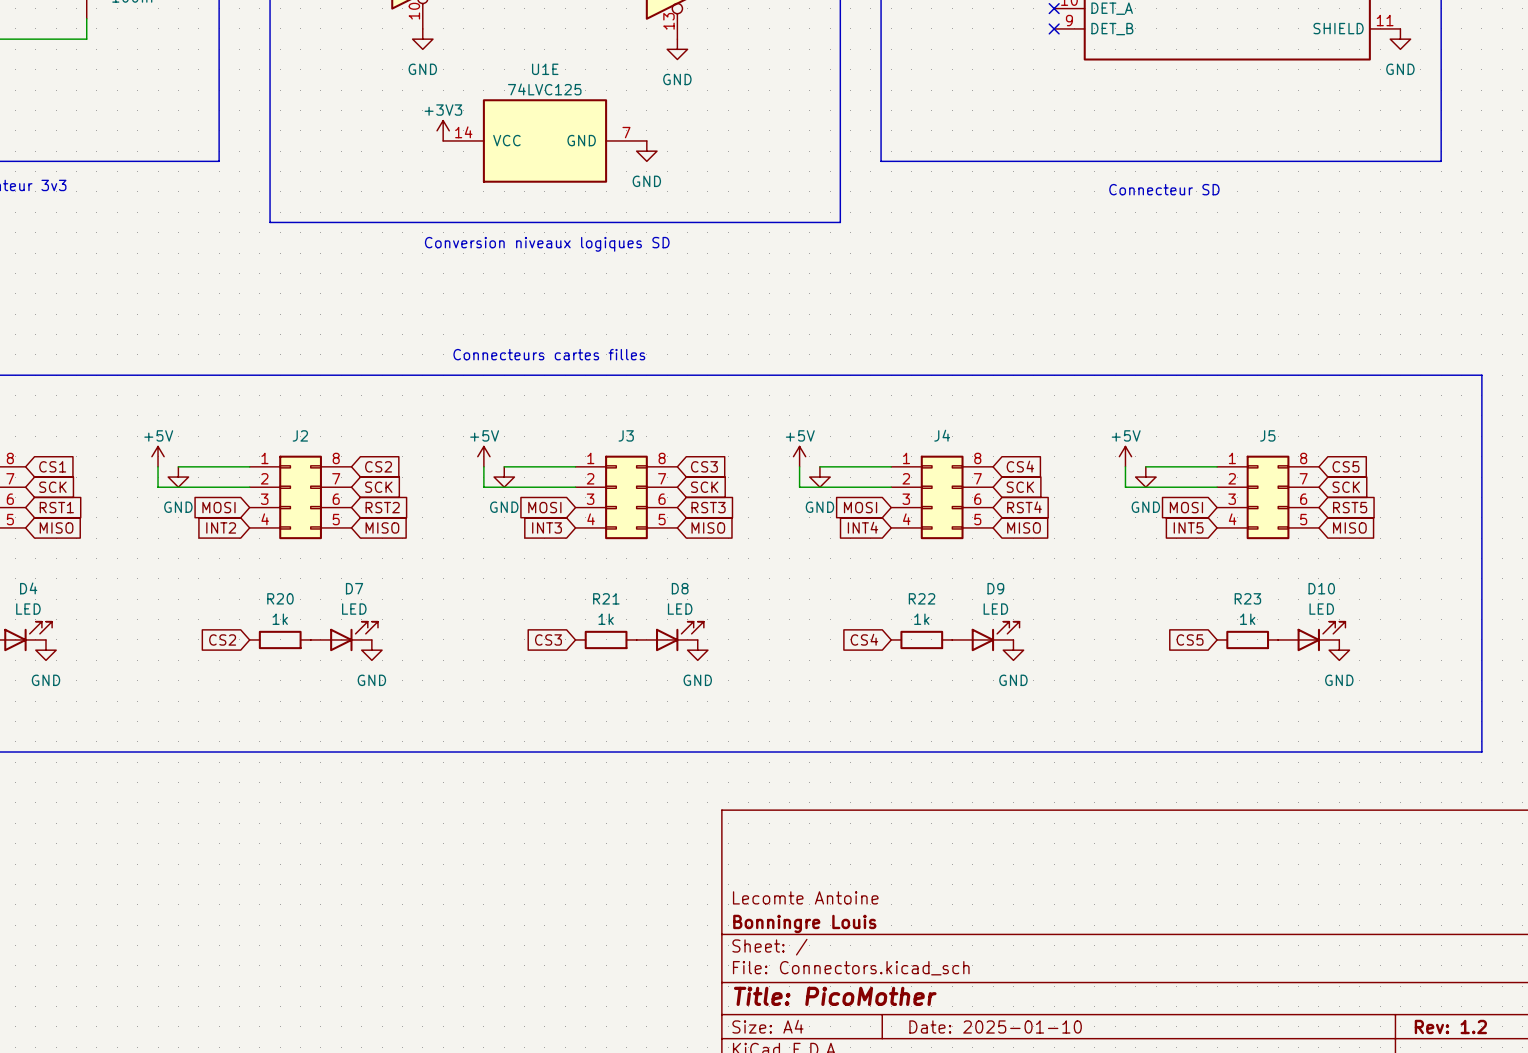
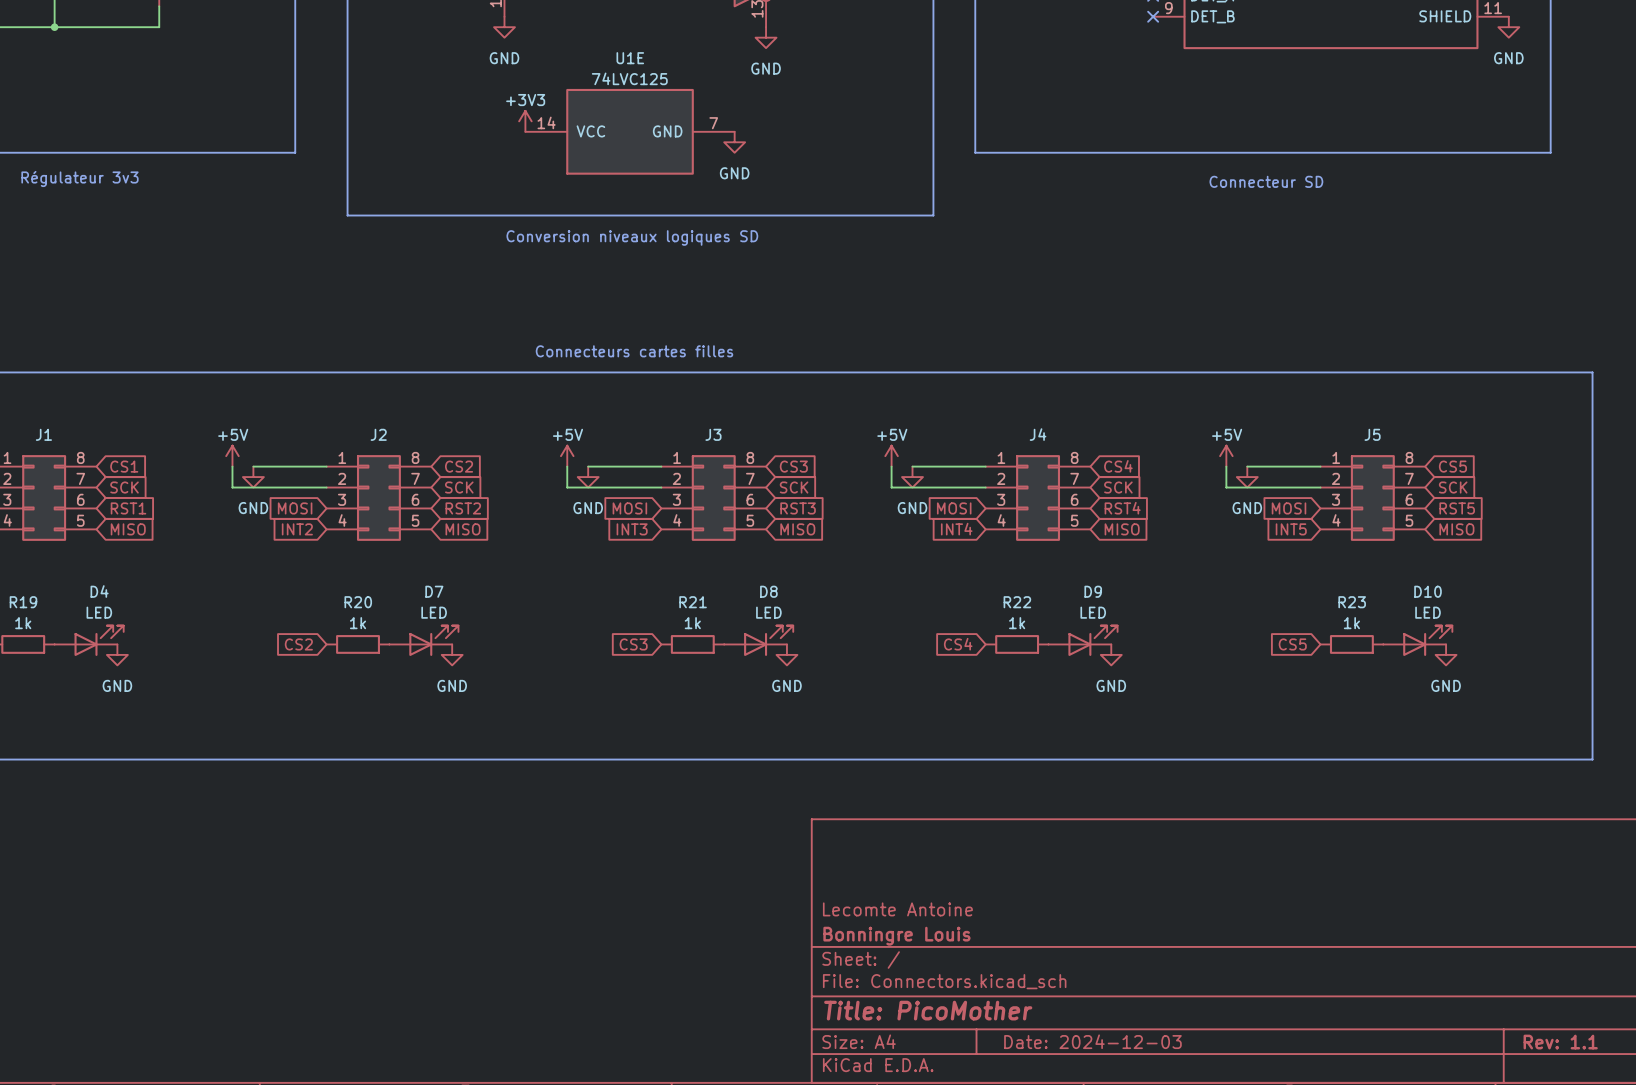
title block: Date: 2025-01-10 (995, 1026) -> Date: 2024-12-03 (1092, 1041)
title block: Rev: 1.2 (1450, 1026) -> Rev: 1.1 (1560, 1042)

